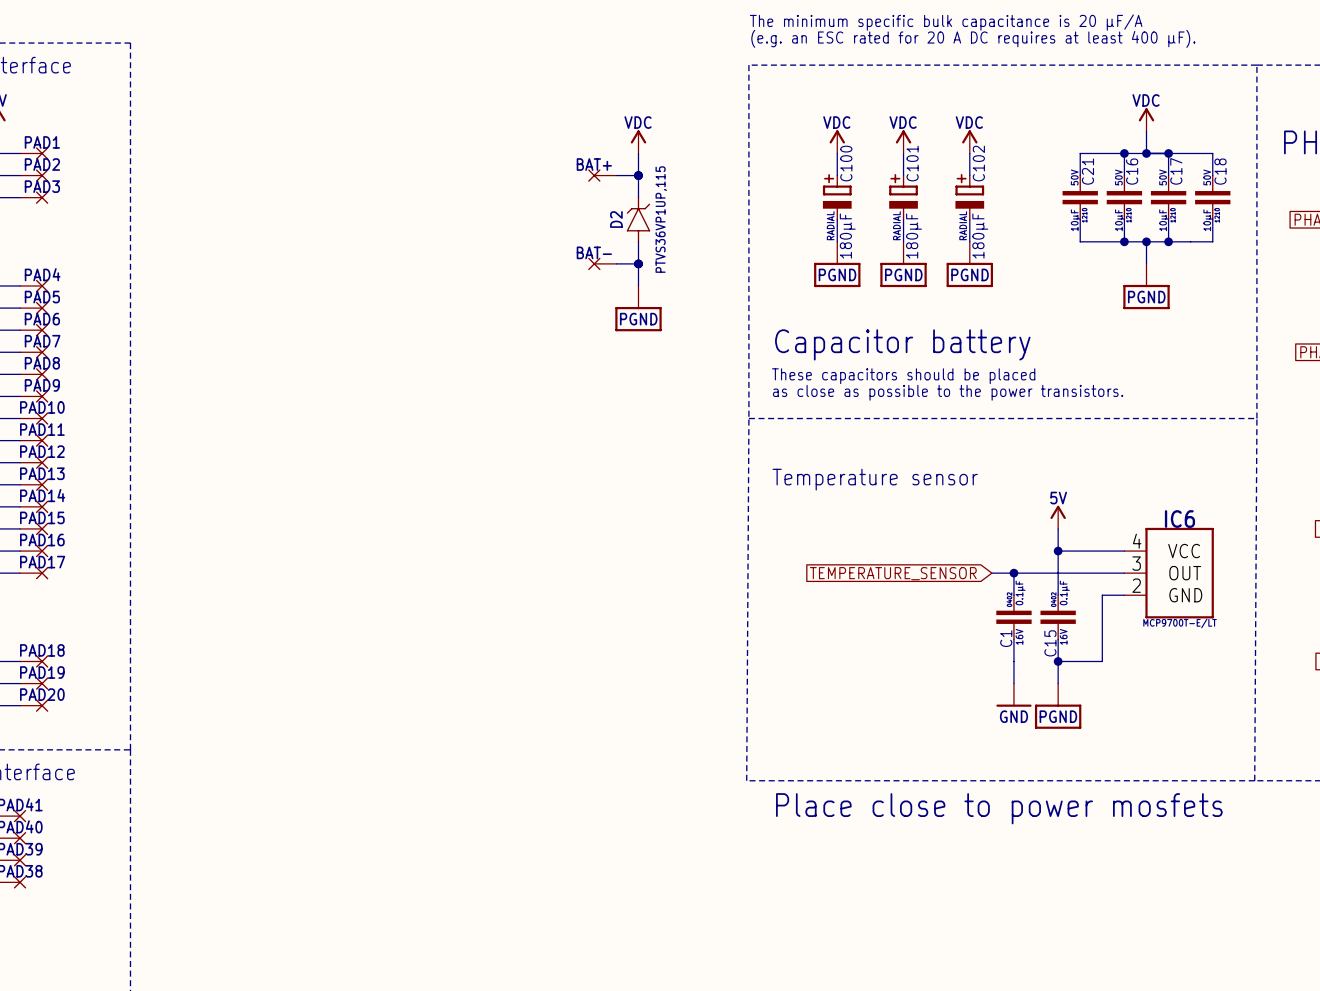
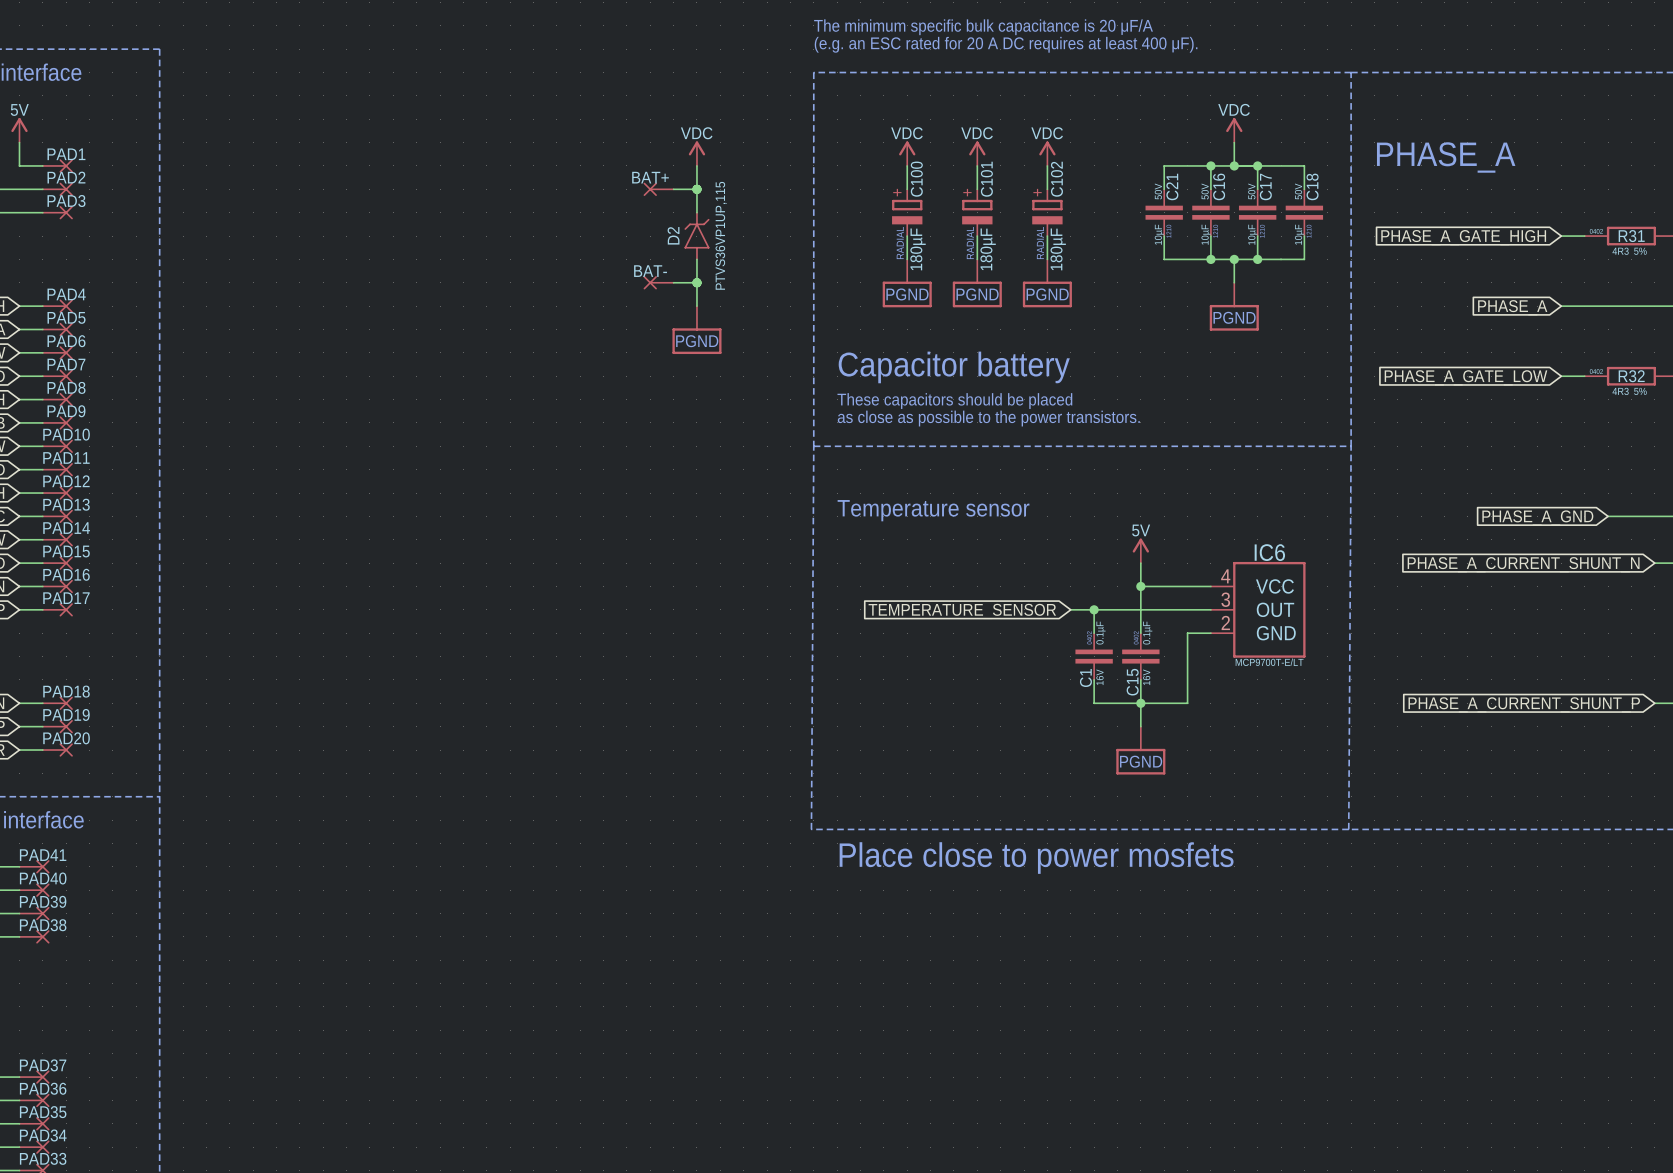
wire: (1013, 661) (1013, 683) -> (1094, 703) (1140, 703)
power symbol: GND (1013, 695) -> none

